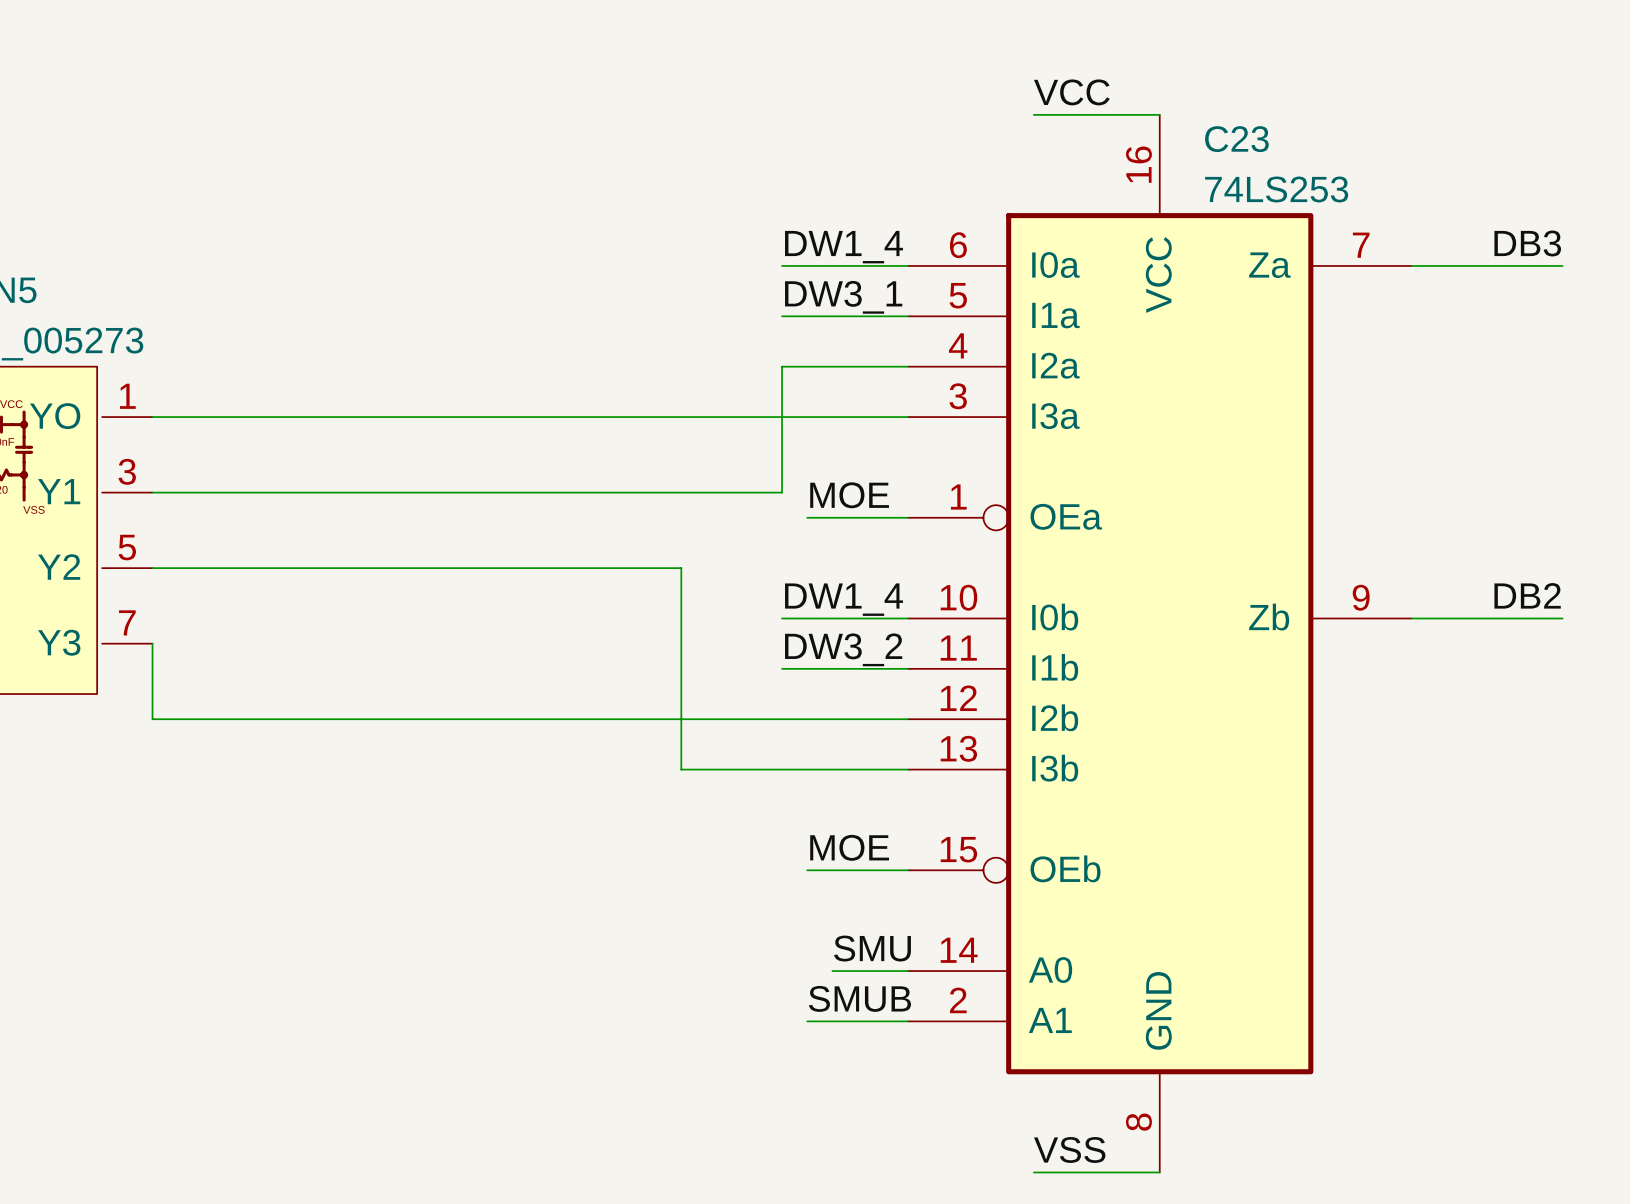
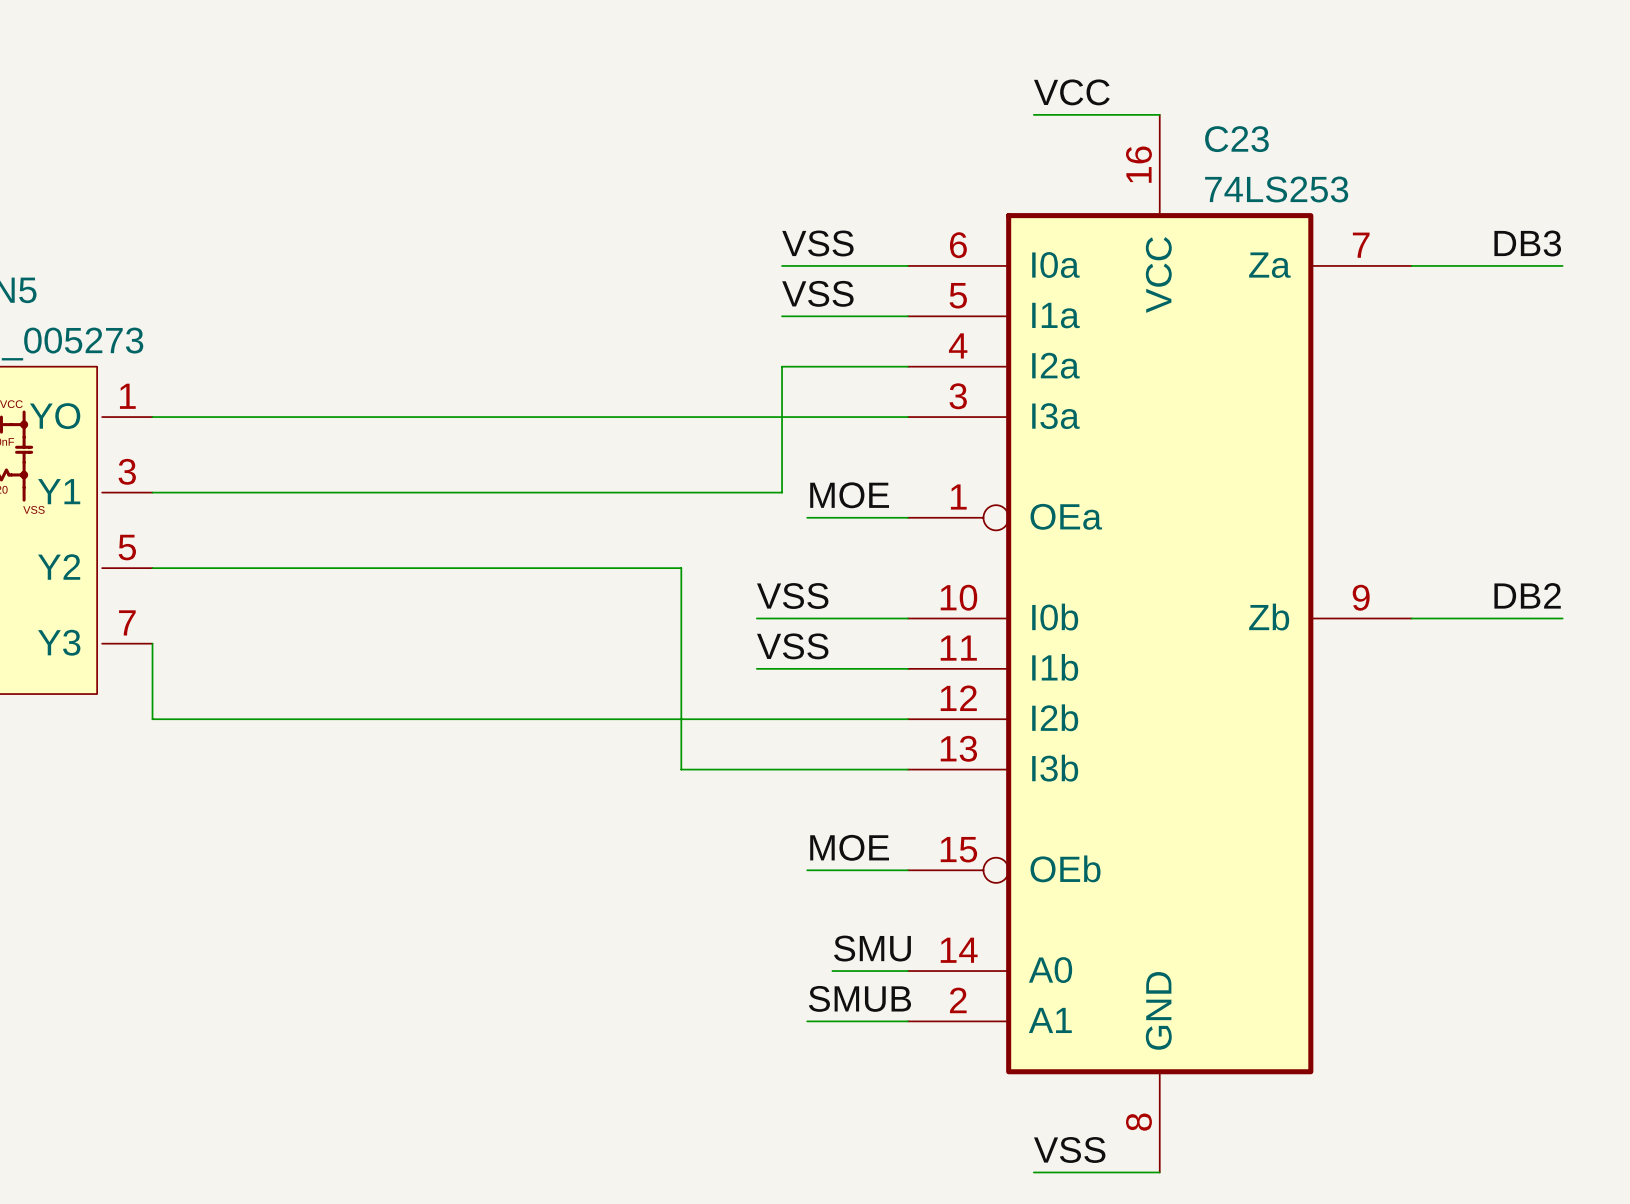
label: DW1_4 (844, 247) -> VSS (817, 243)
label: DW3_1 (843, 297) -> VSS (817, 293)
label: none -> VSS (792, 596)
label: DW1_4 (844, 599) -> none
wire: none -> (756, 618) (782, 618)
label: none -> VSS (792, 646)
label: DW3_2 (843, 649) -> none
wire: none -> (756, 668) (782, 668)

